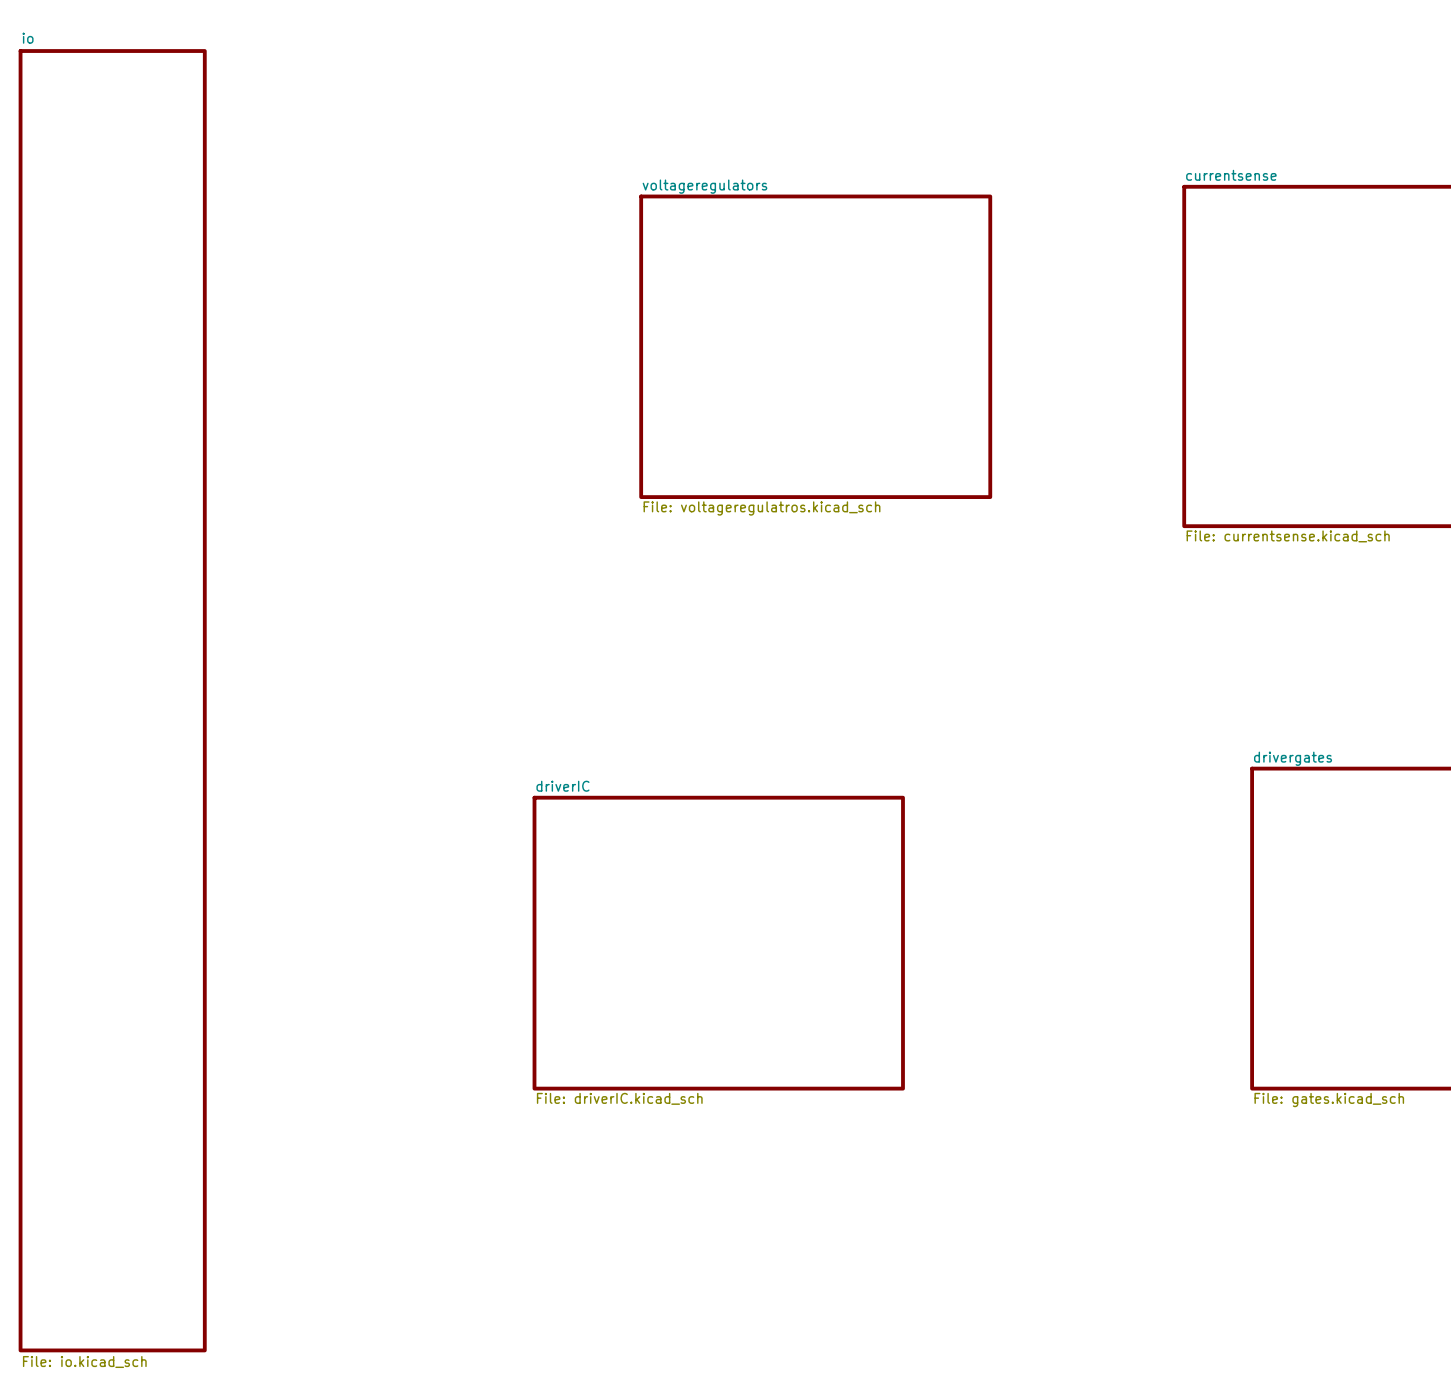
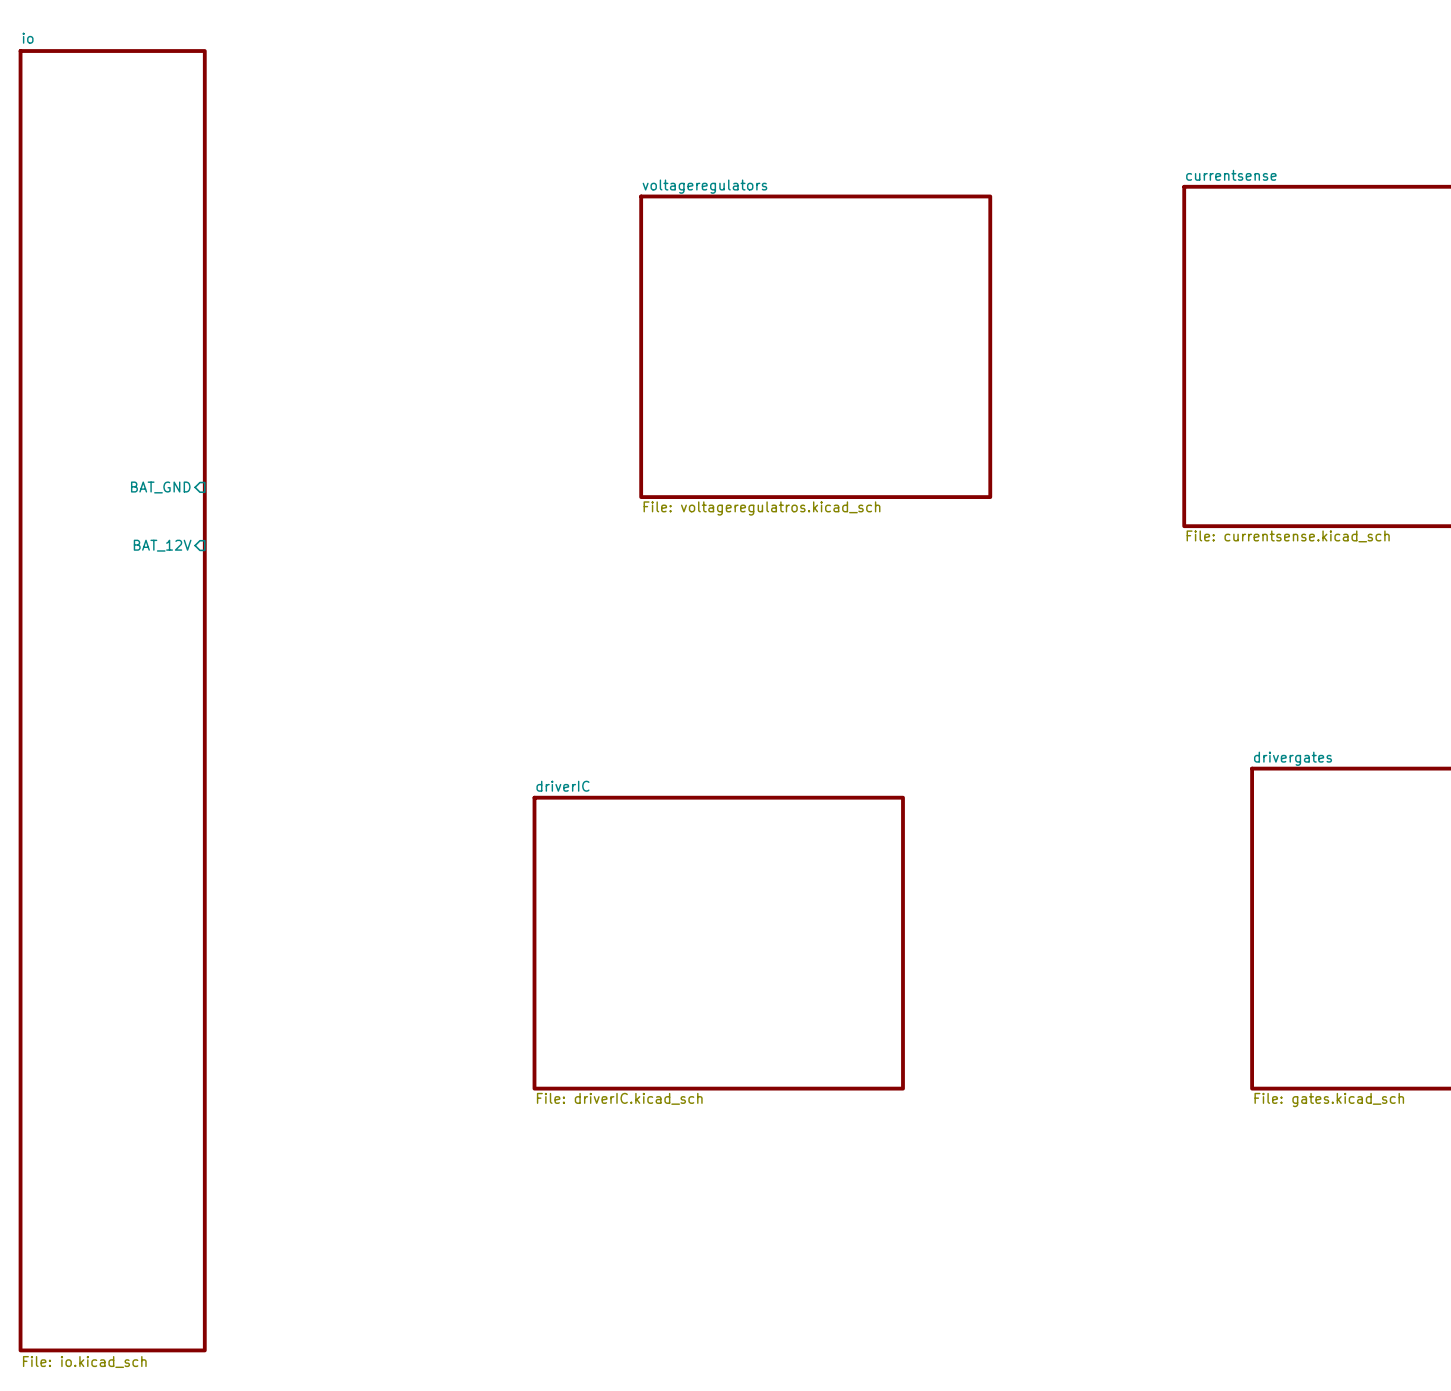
sheet pin: none -> BAT_GND (160, 487)
sheet pin: none -> BAT_12V (162, 545)

